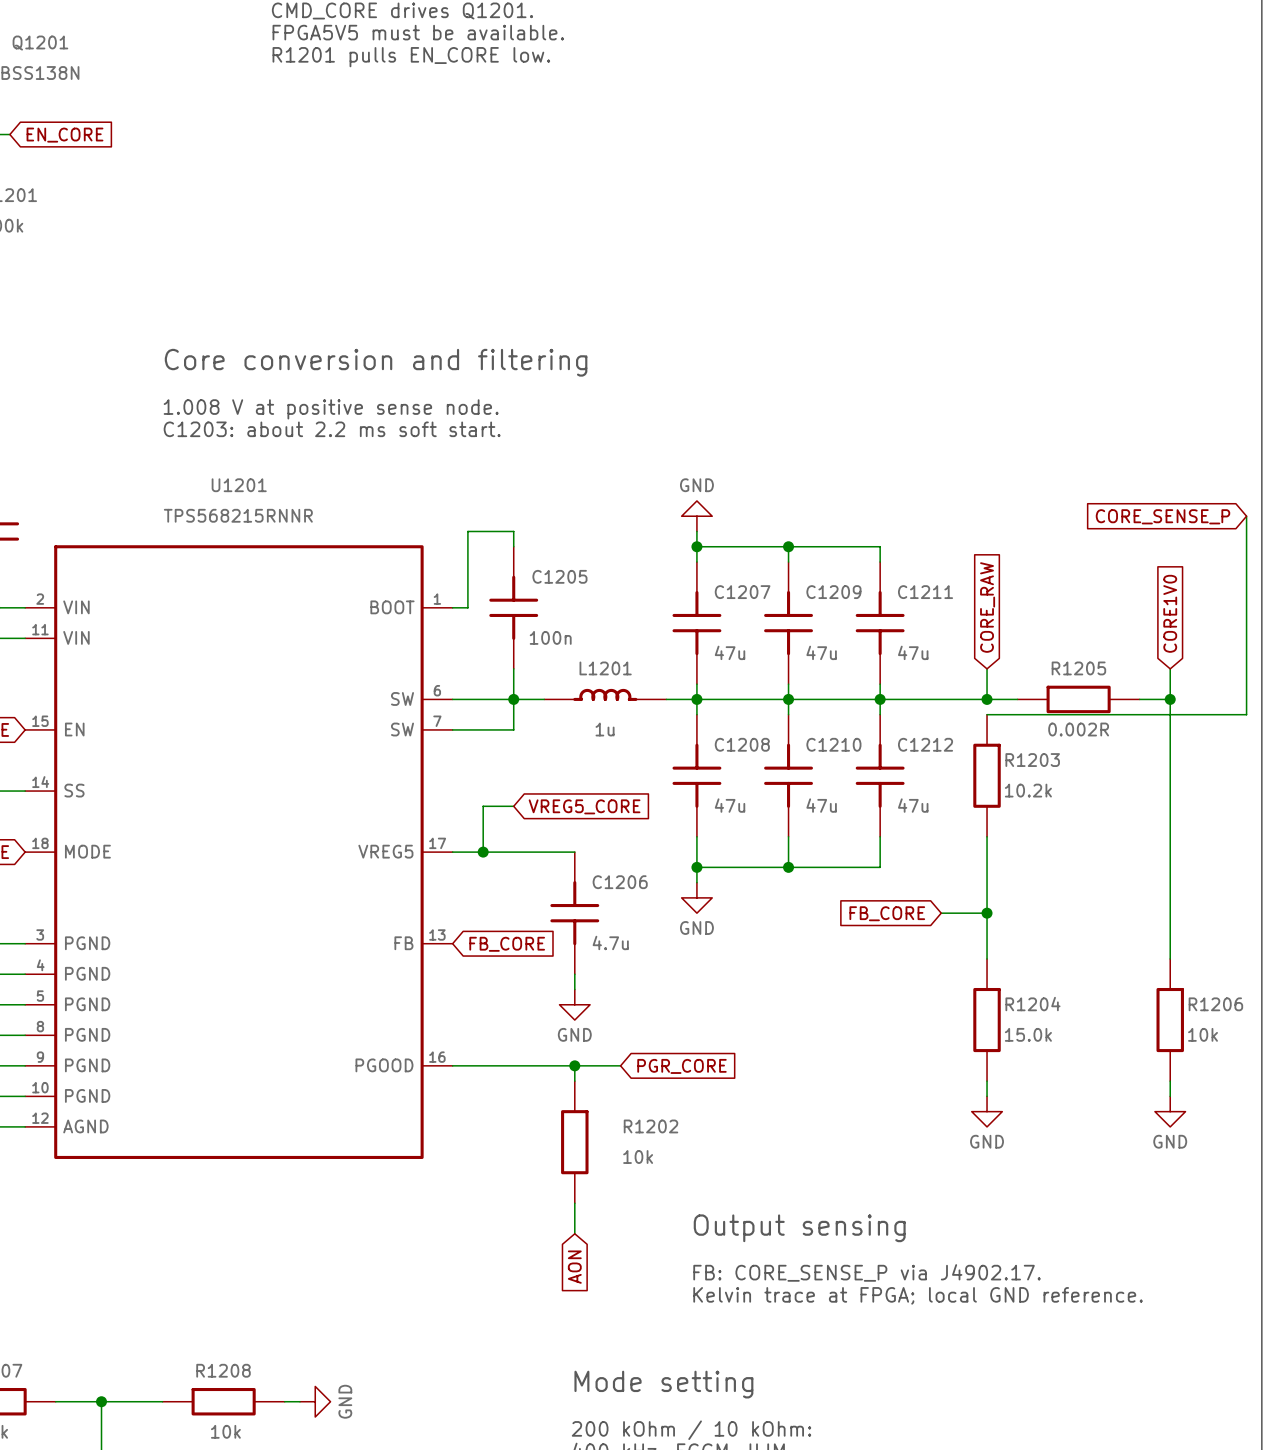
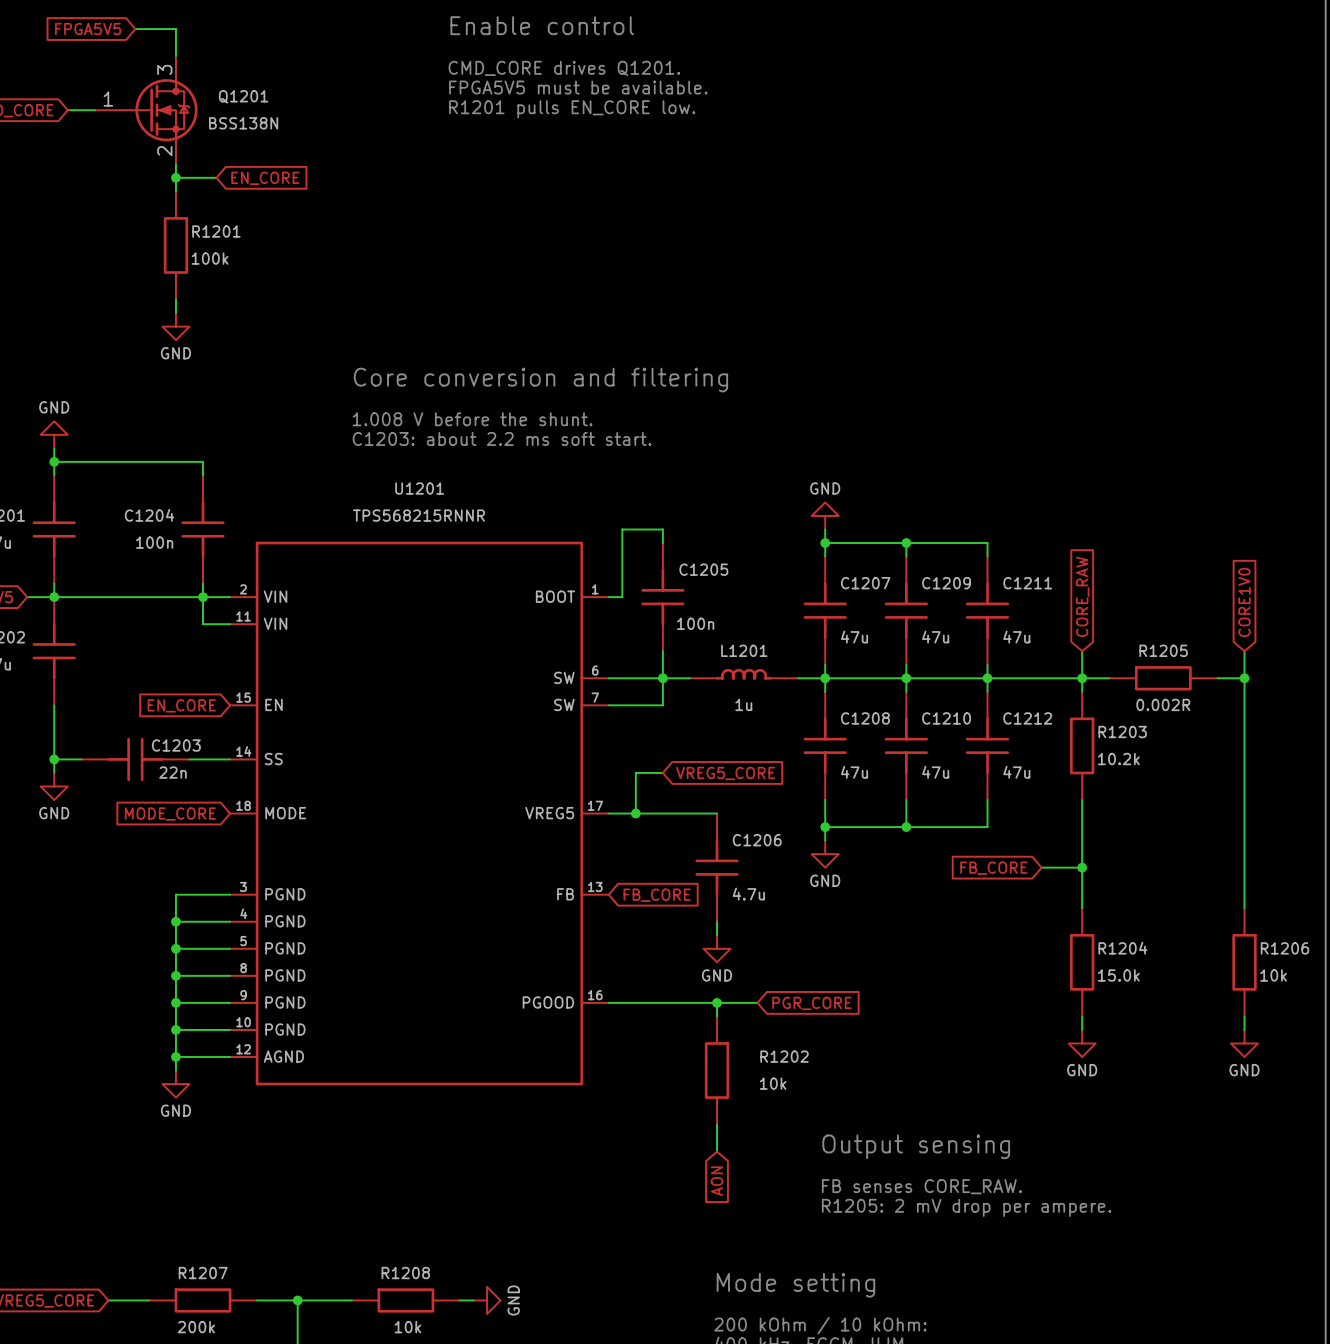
text: 1.008 V at positive sense node. (331, 409) -> 1.008 V before the shunt. (472, 419)
global label: CORE_SENSE_P (1162, 516) -> none
wire: (1246, 516) (1246, 714) (987, 714) -> (1082, 678) (1082, 691)
text: FB: CORE_SENSE_P via J4902.17. (867, 1272) -> FB senses CORE_RAW. (921, 1186)
text: Kelvin trace at FPGA; local GND reference. (918, 1295) -> R1205: 2 mV drop per ampere. (966, 1207)

